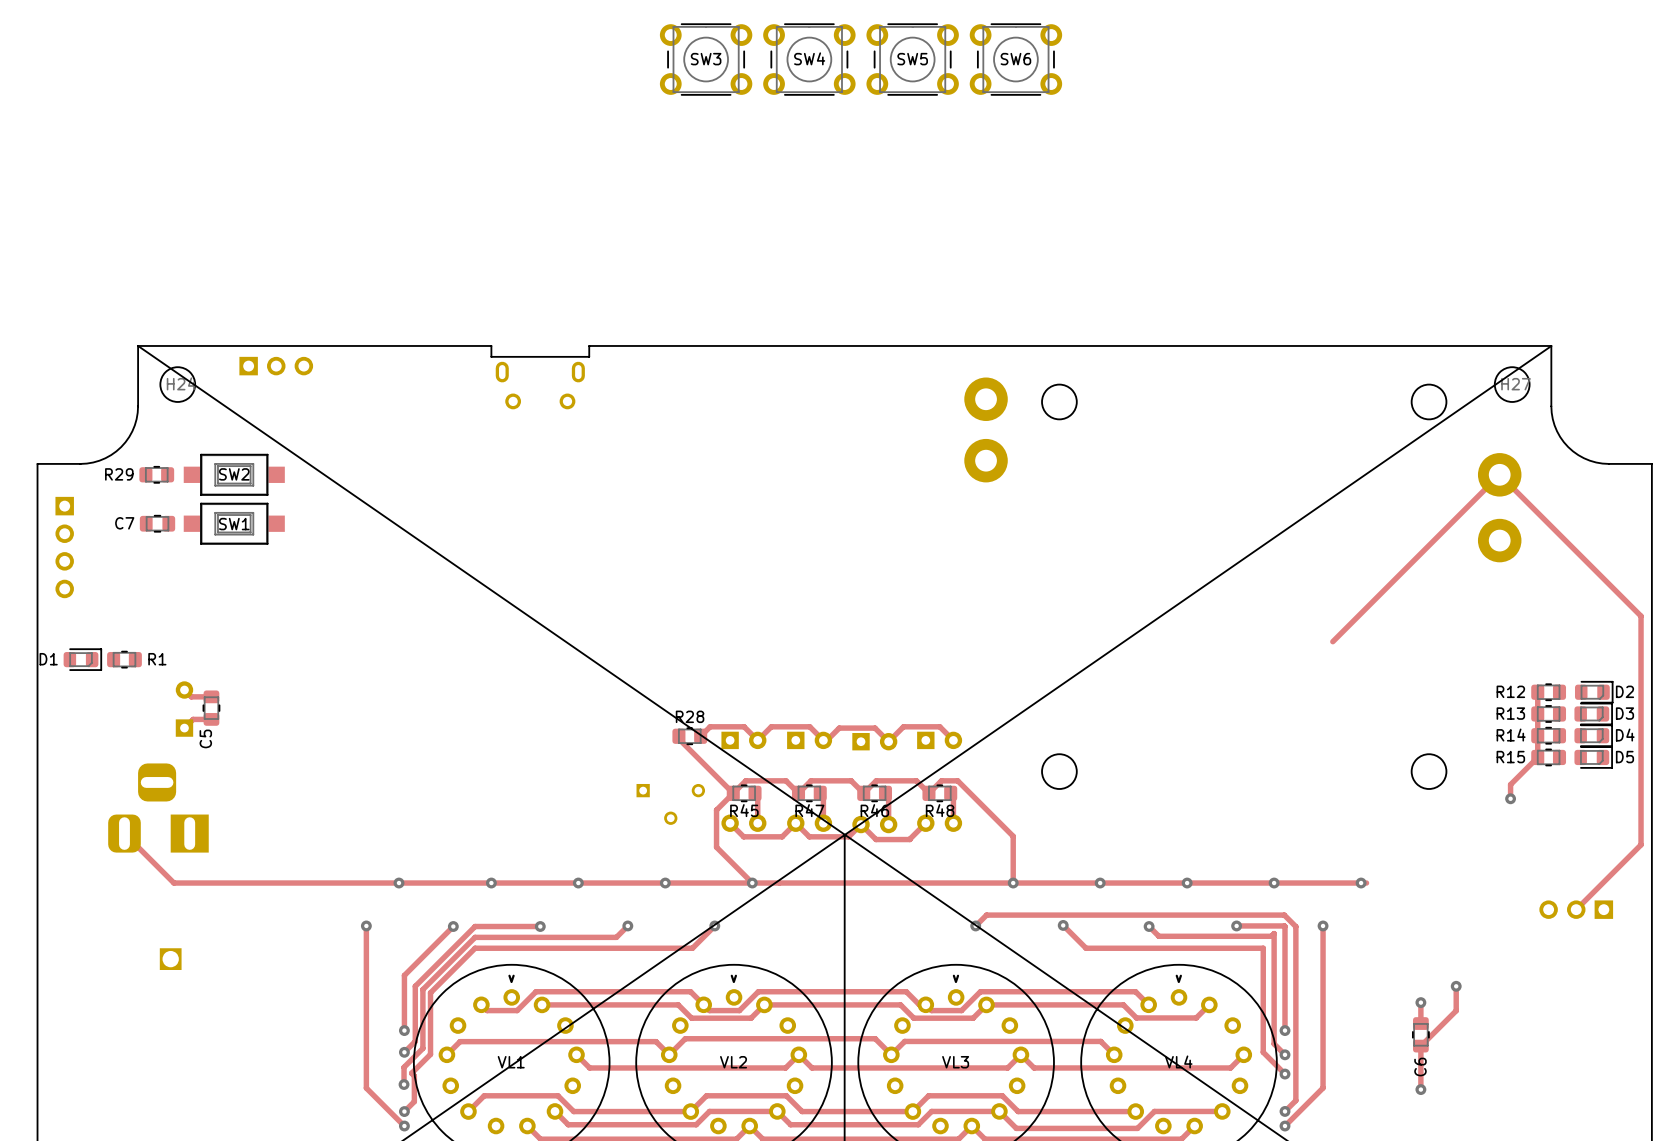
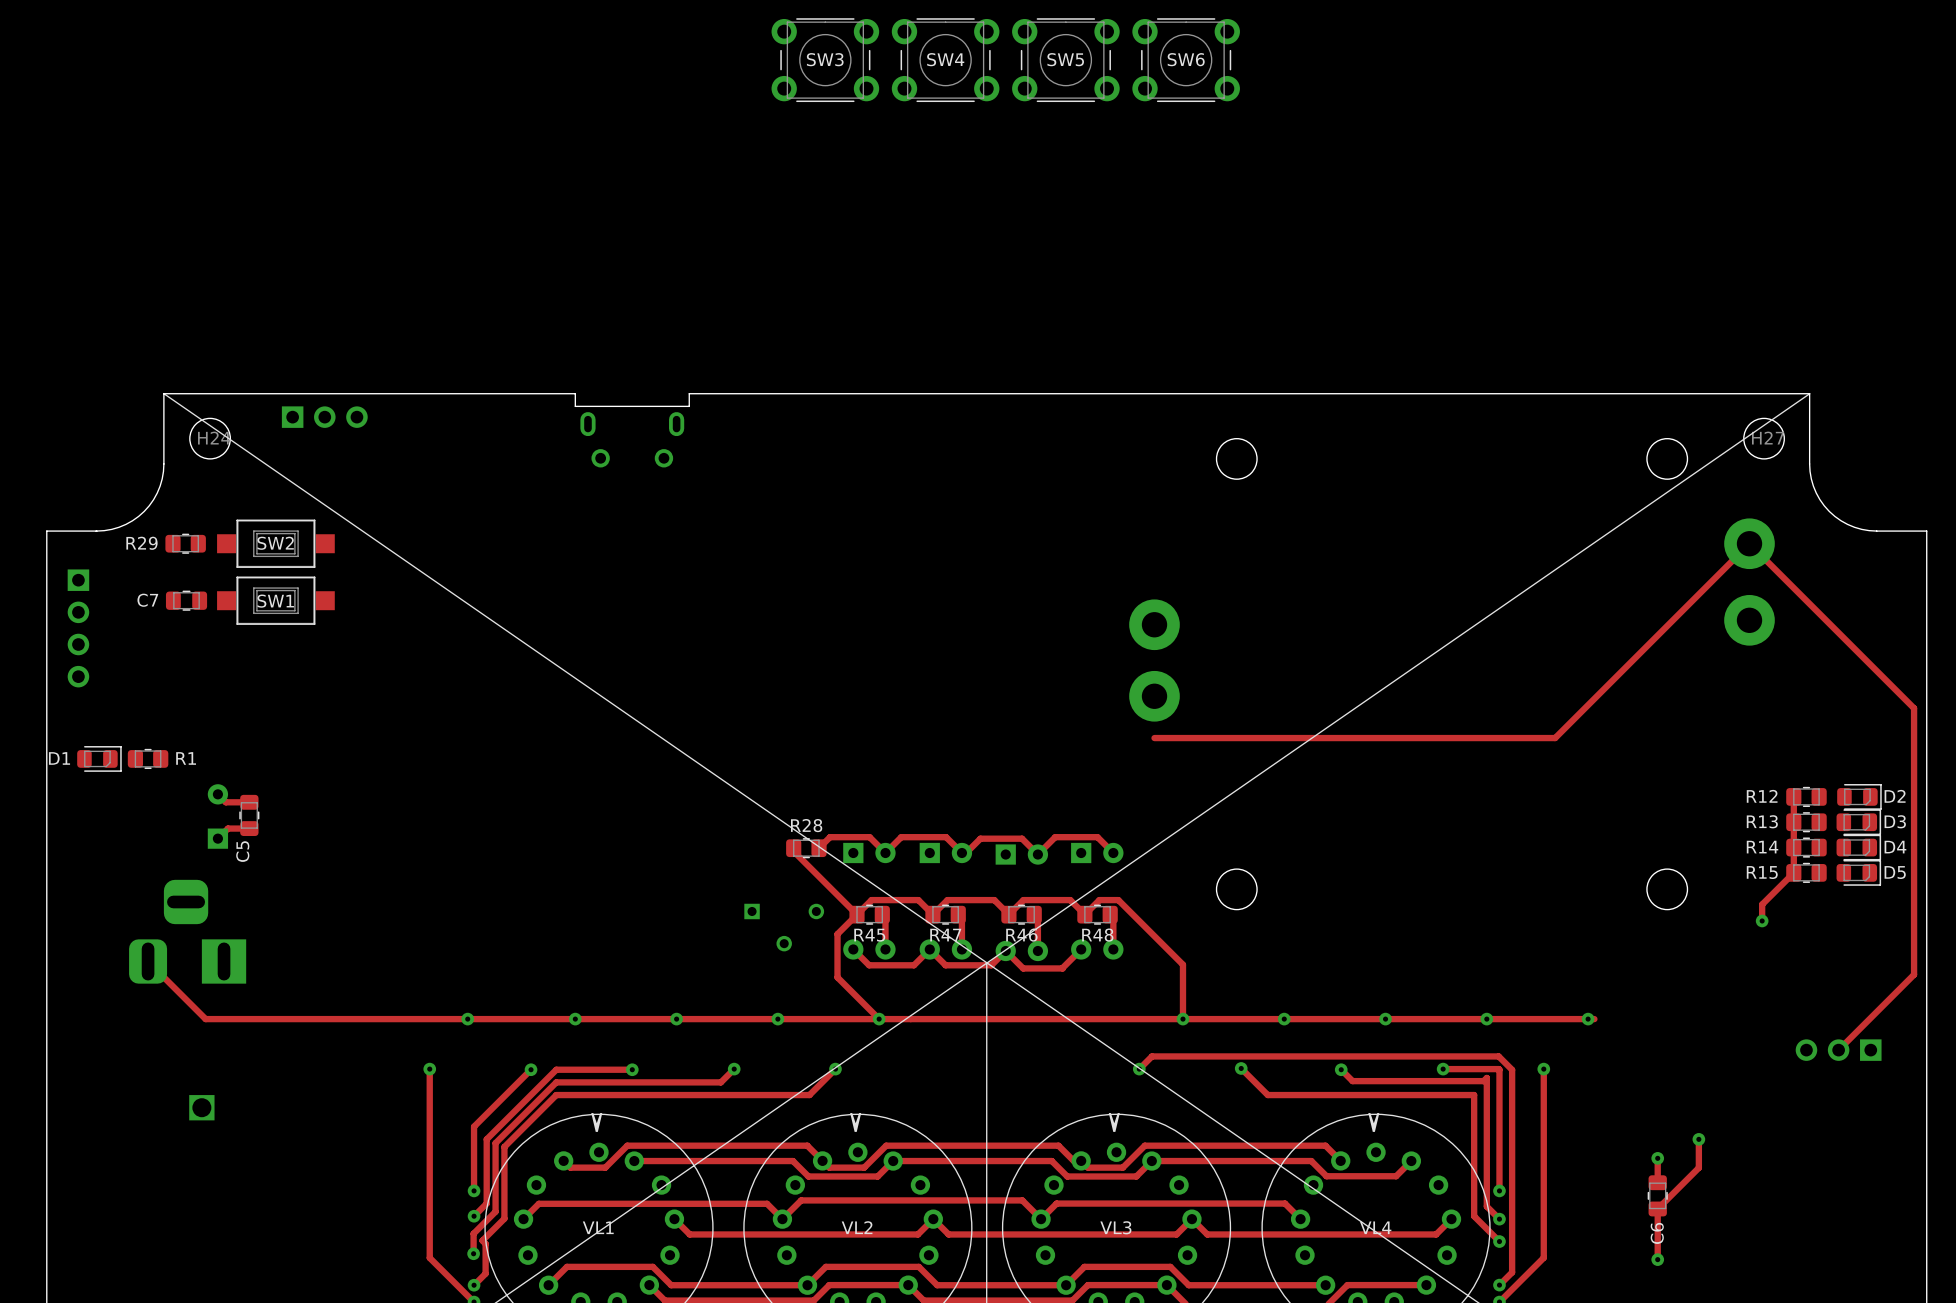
part: (986, 399) -> none
part: (986, 460) -> none
part: none -> (1154, 624)
part: none -> (1154, 696)
track: none -> (1154, 738) (1555, 738)

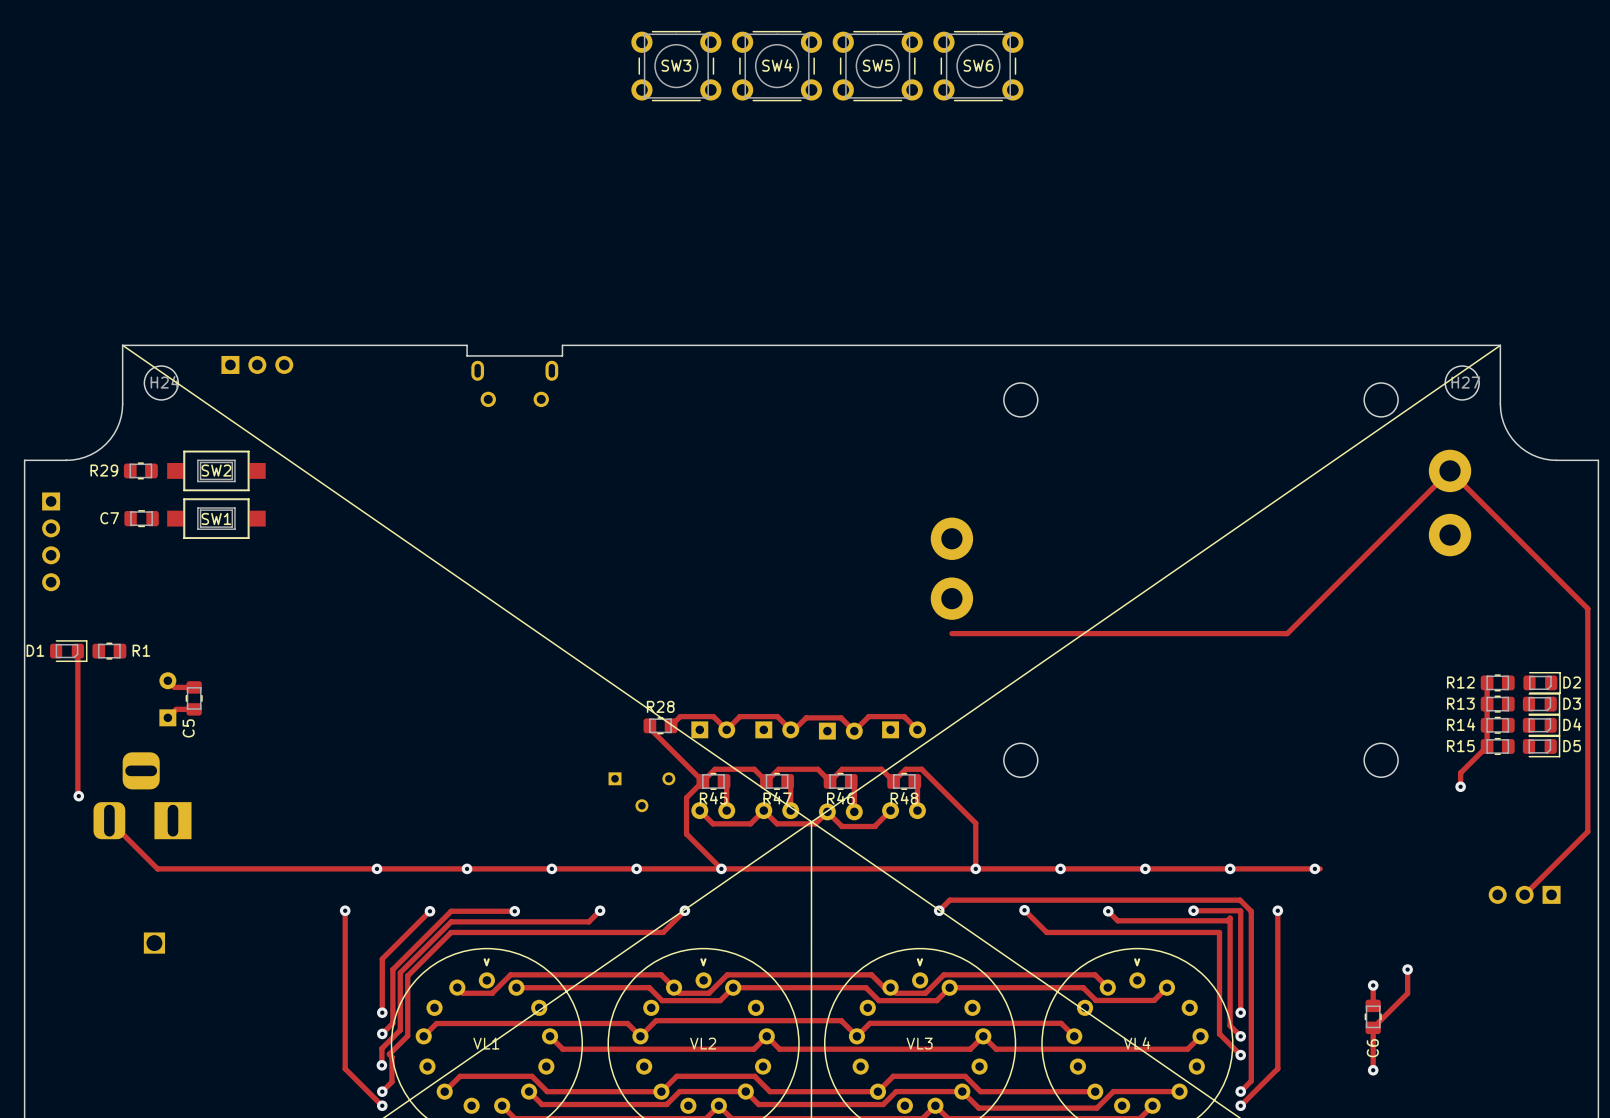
track: none -> (77, 651) (78, 796)
via: none -> (78, 796)

